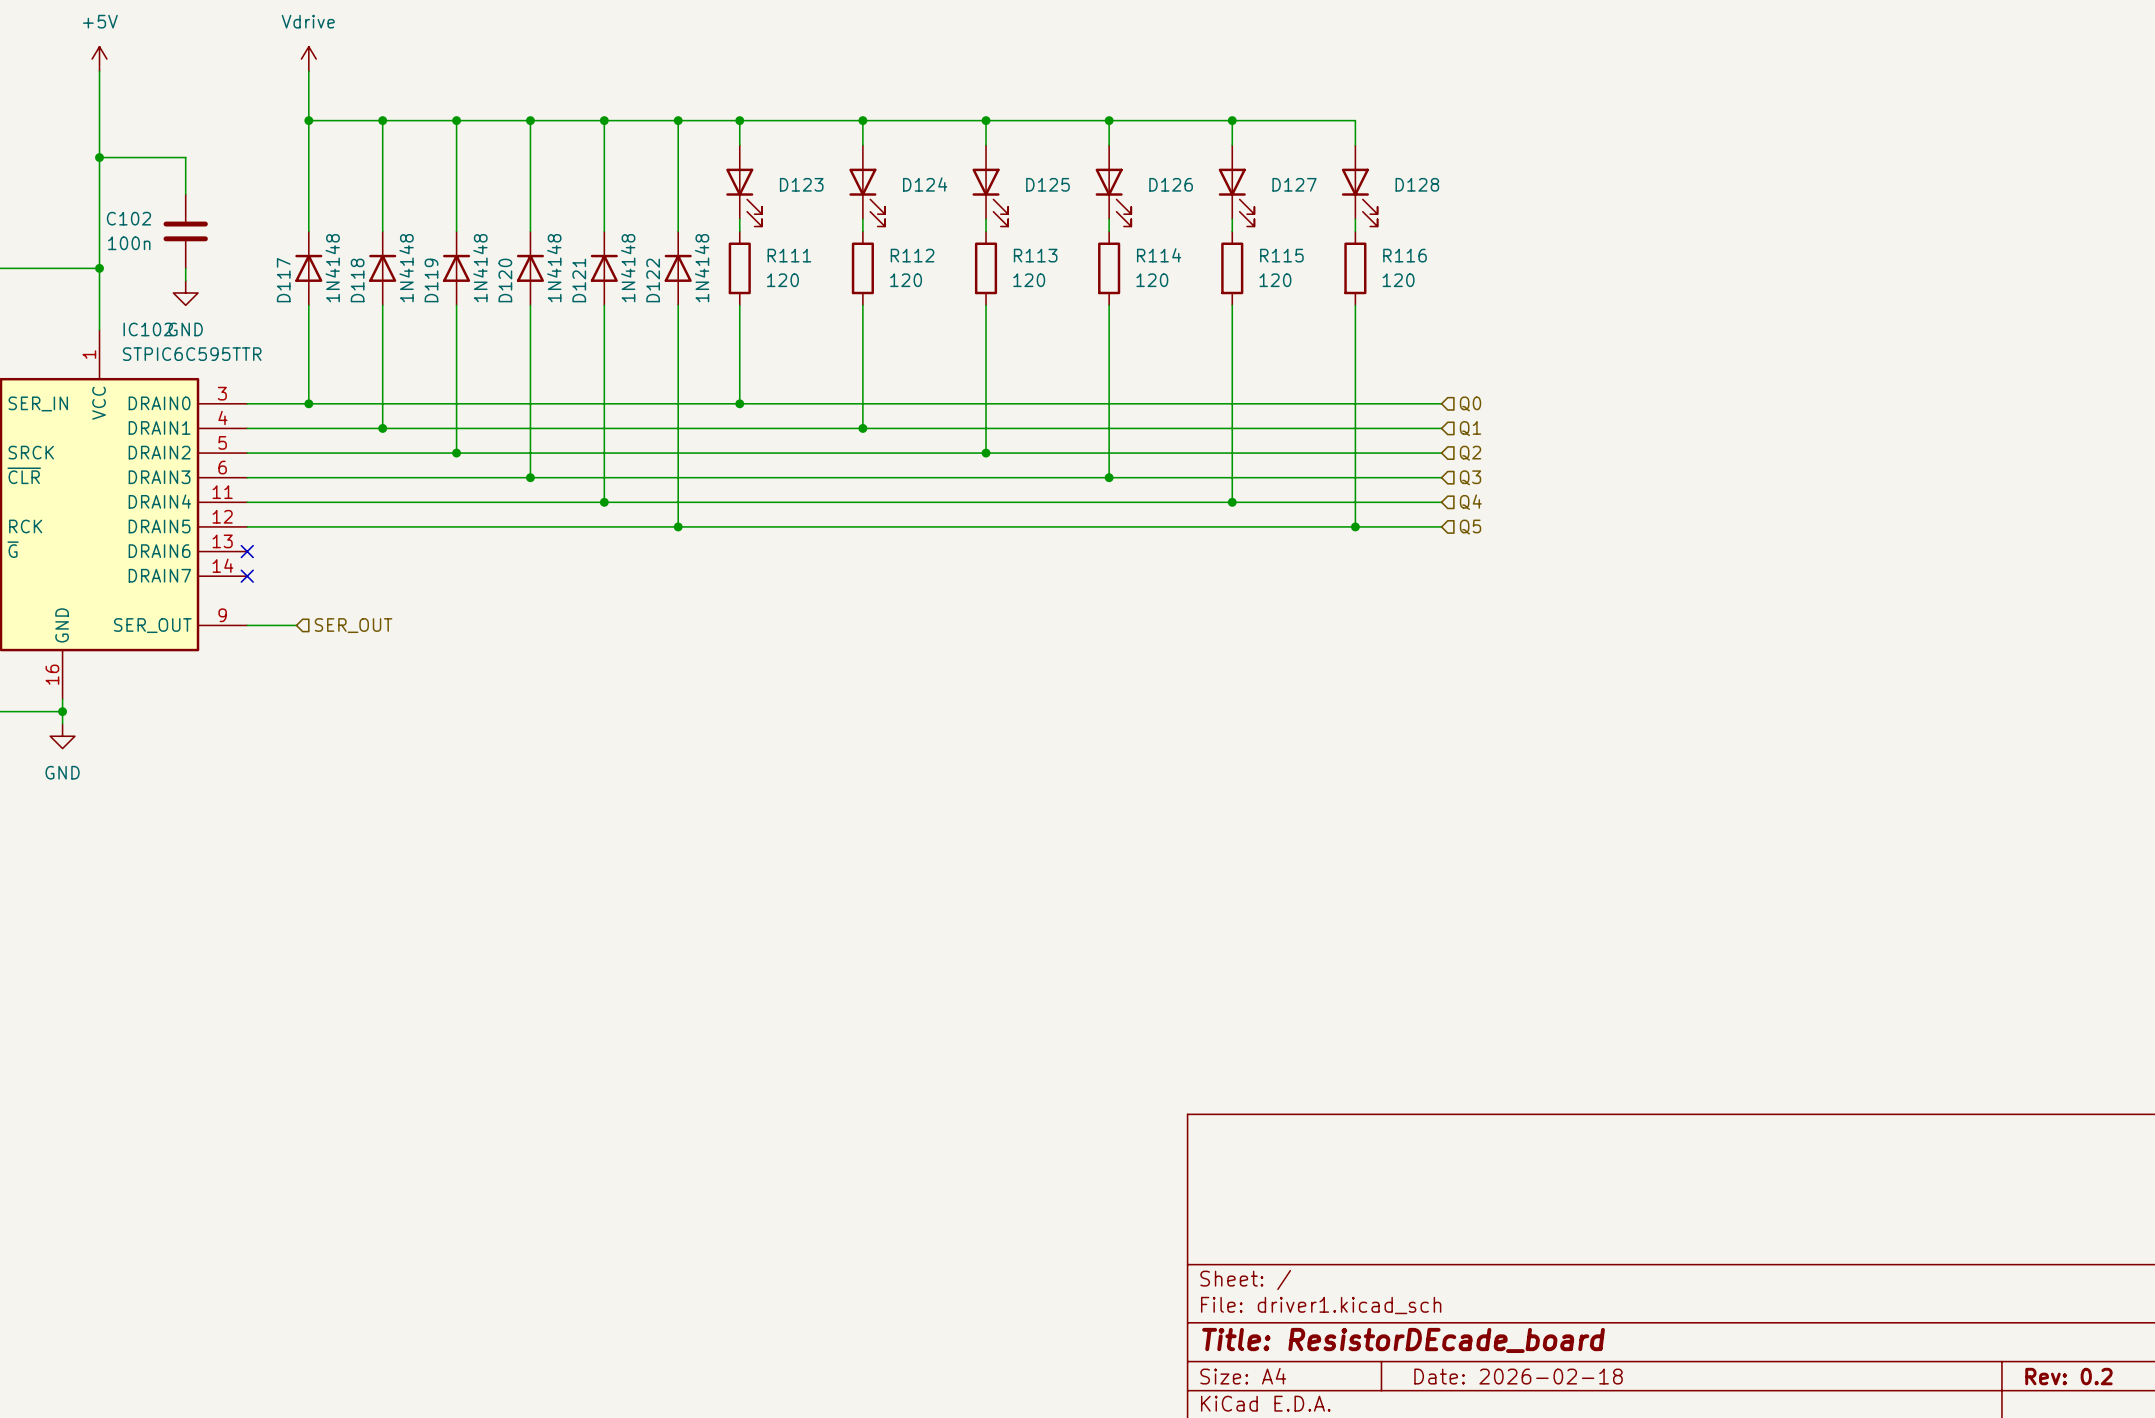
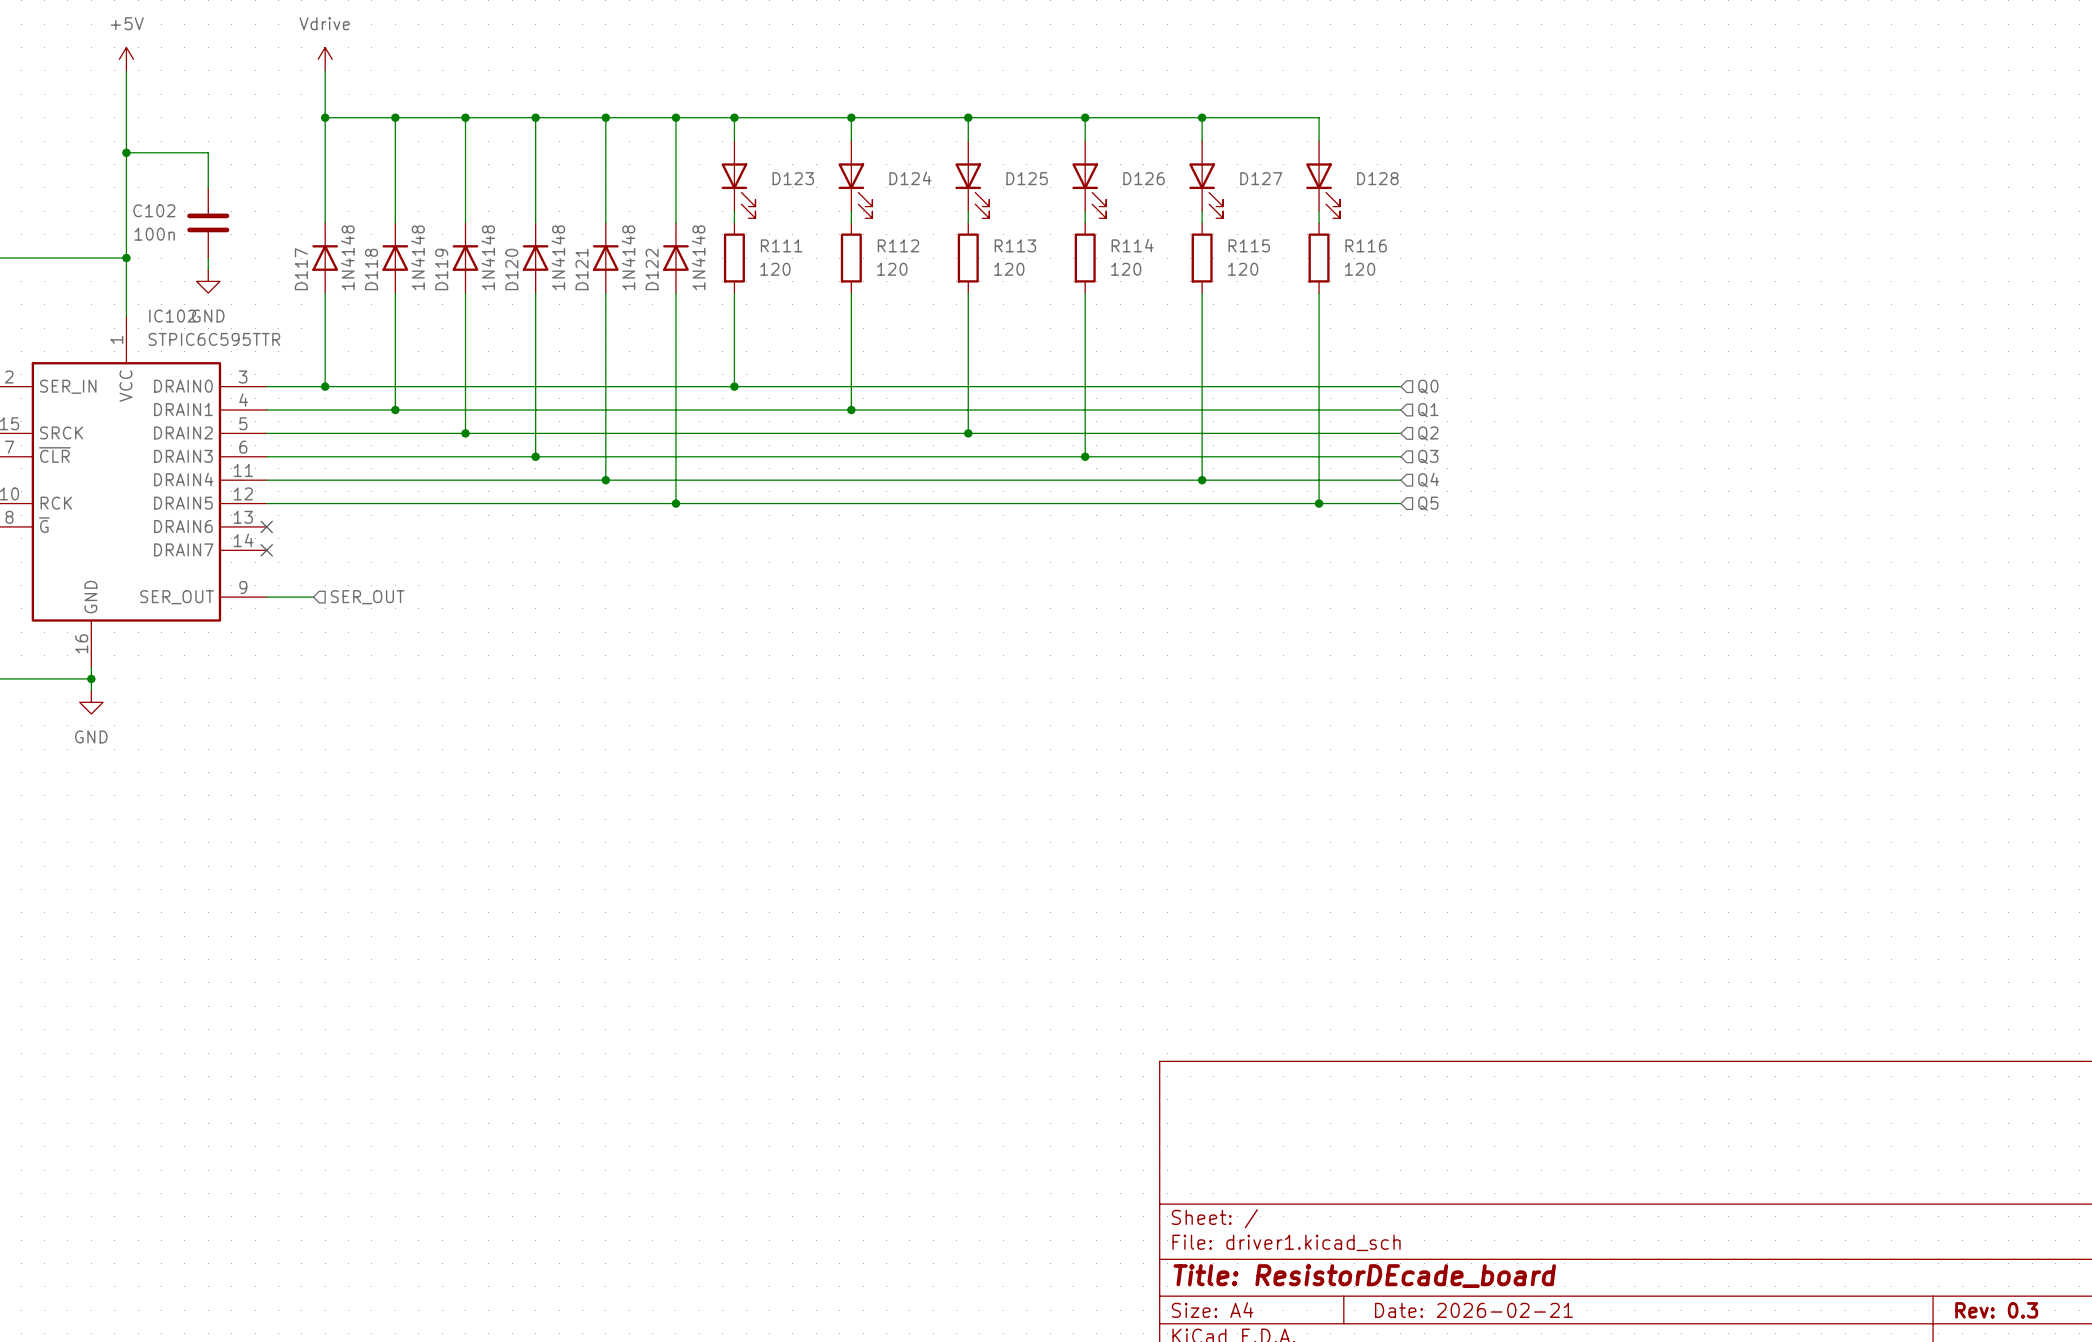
title block: Date: 2026-02-18 (1518, 1376) -> Date: 2026-02-21 (1473, 1310)
title block: Rev: 0.2 (2068, 1376) -> Rev: 0.3 (1996, 1310)

